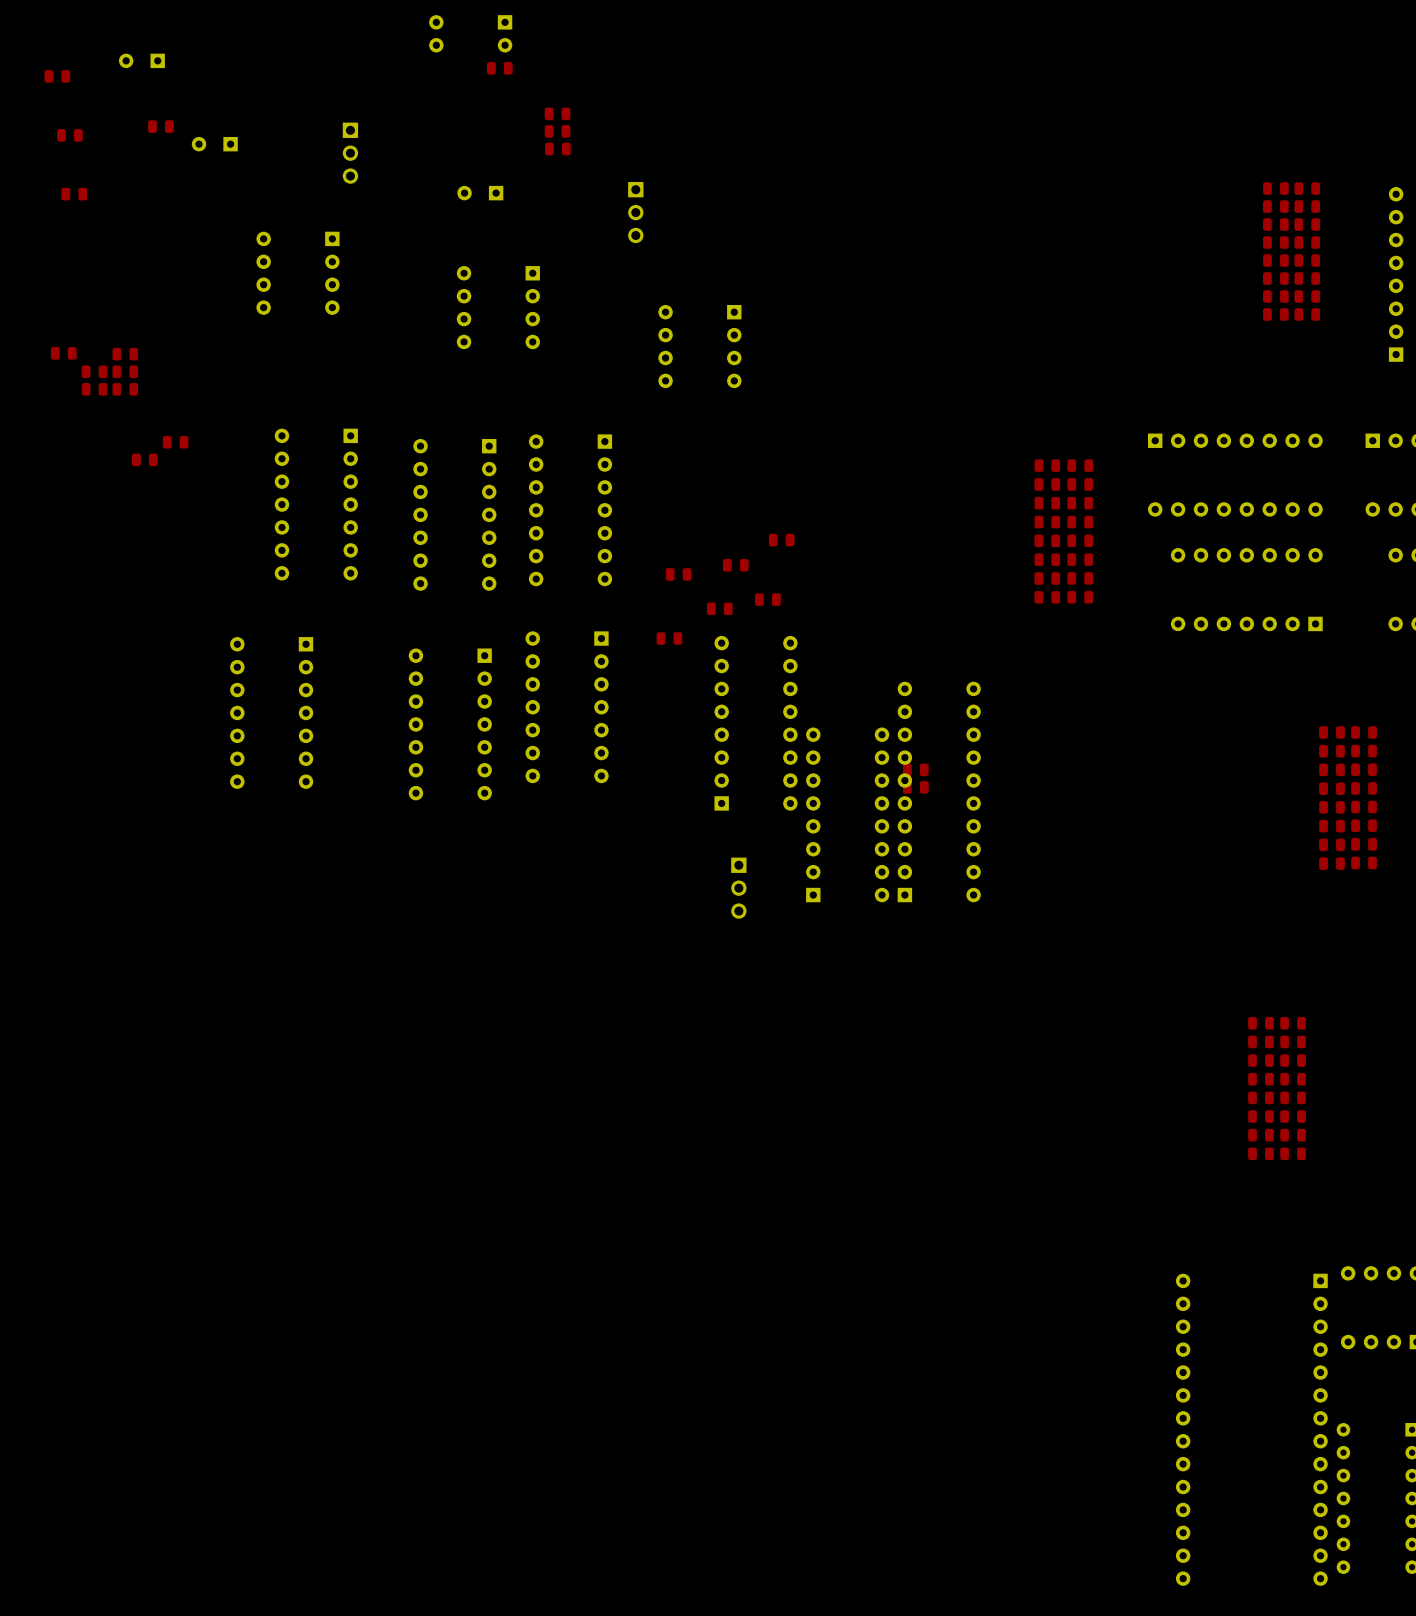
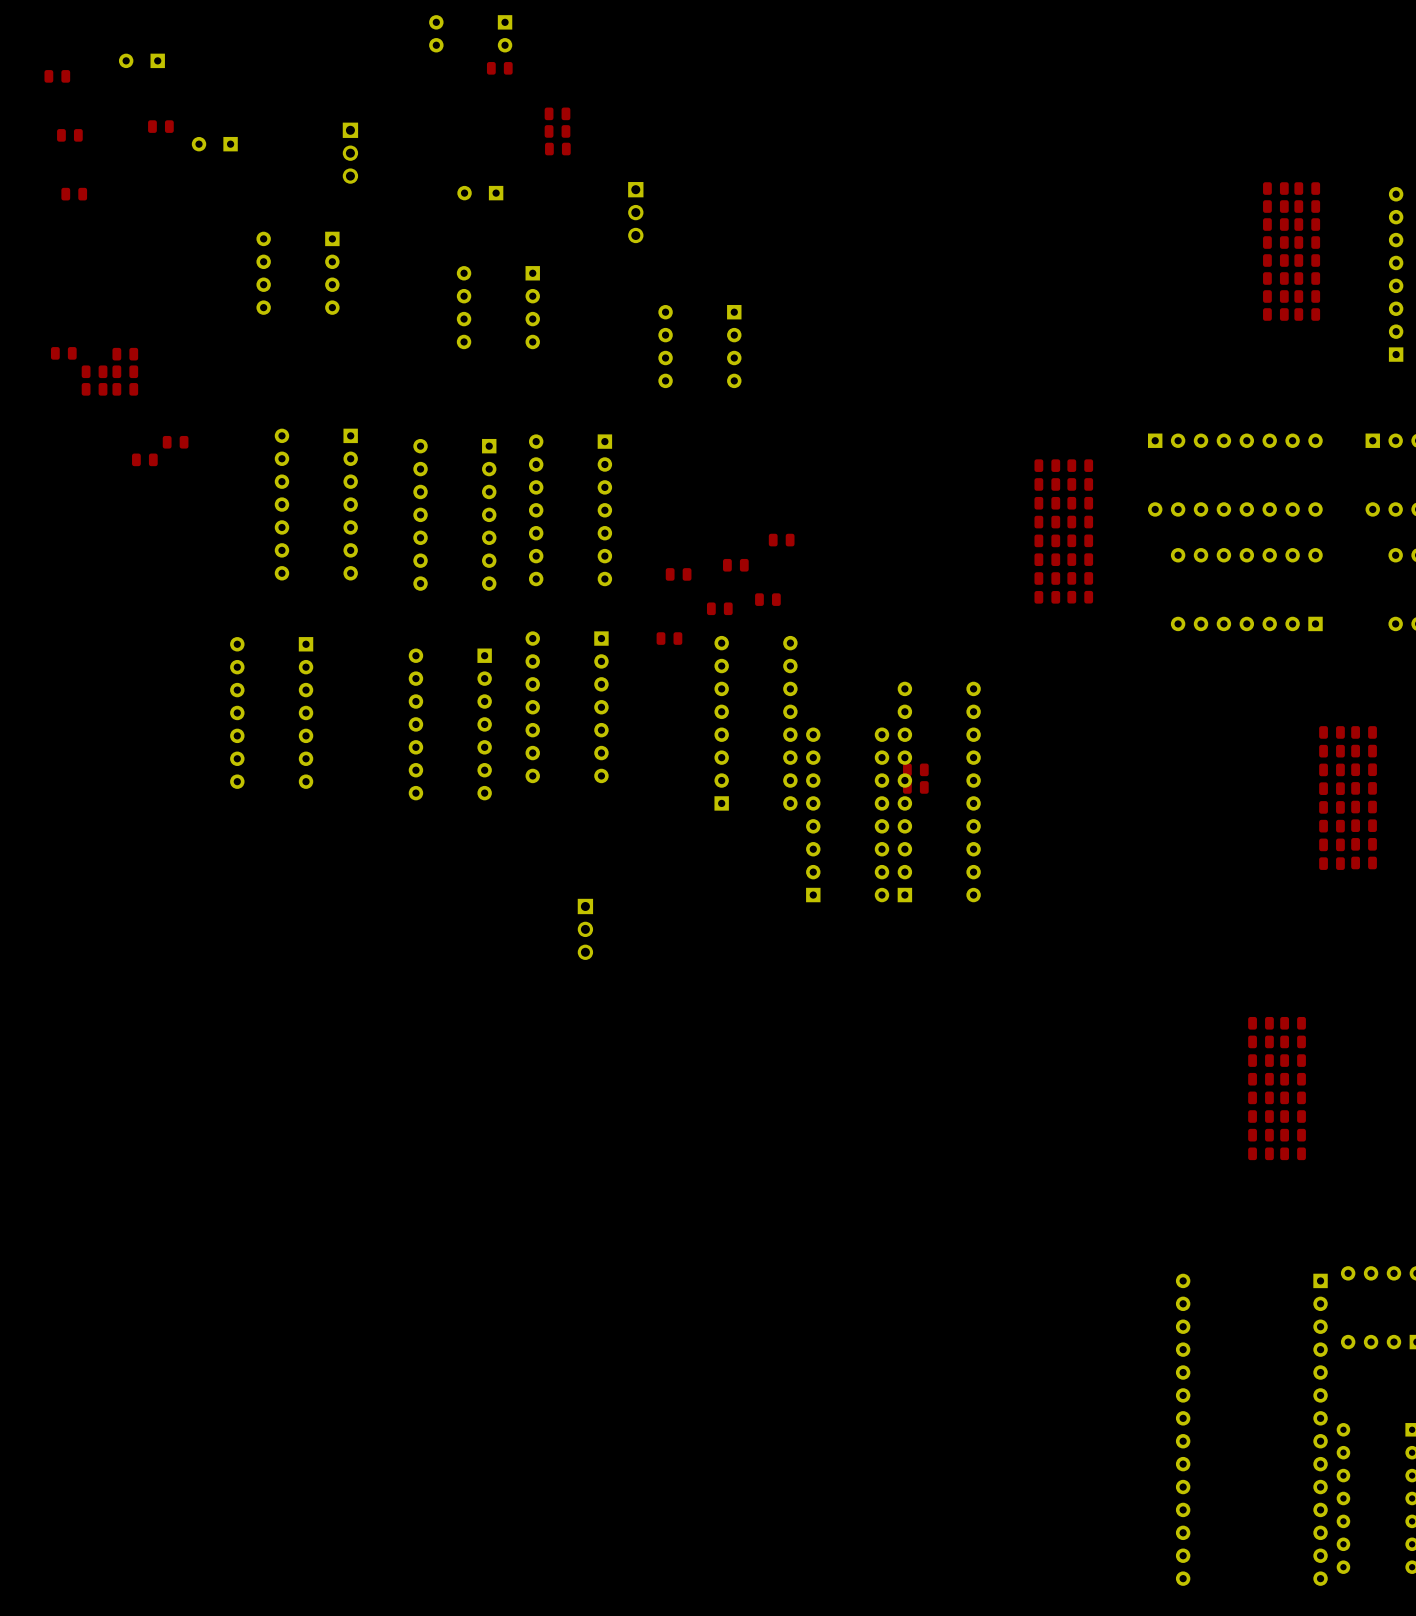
part position: (738, 888) -> (585, 929)

